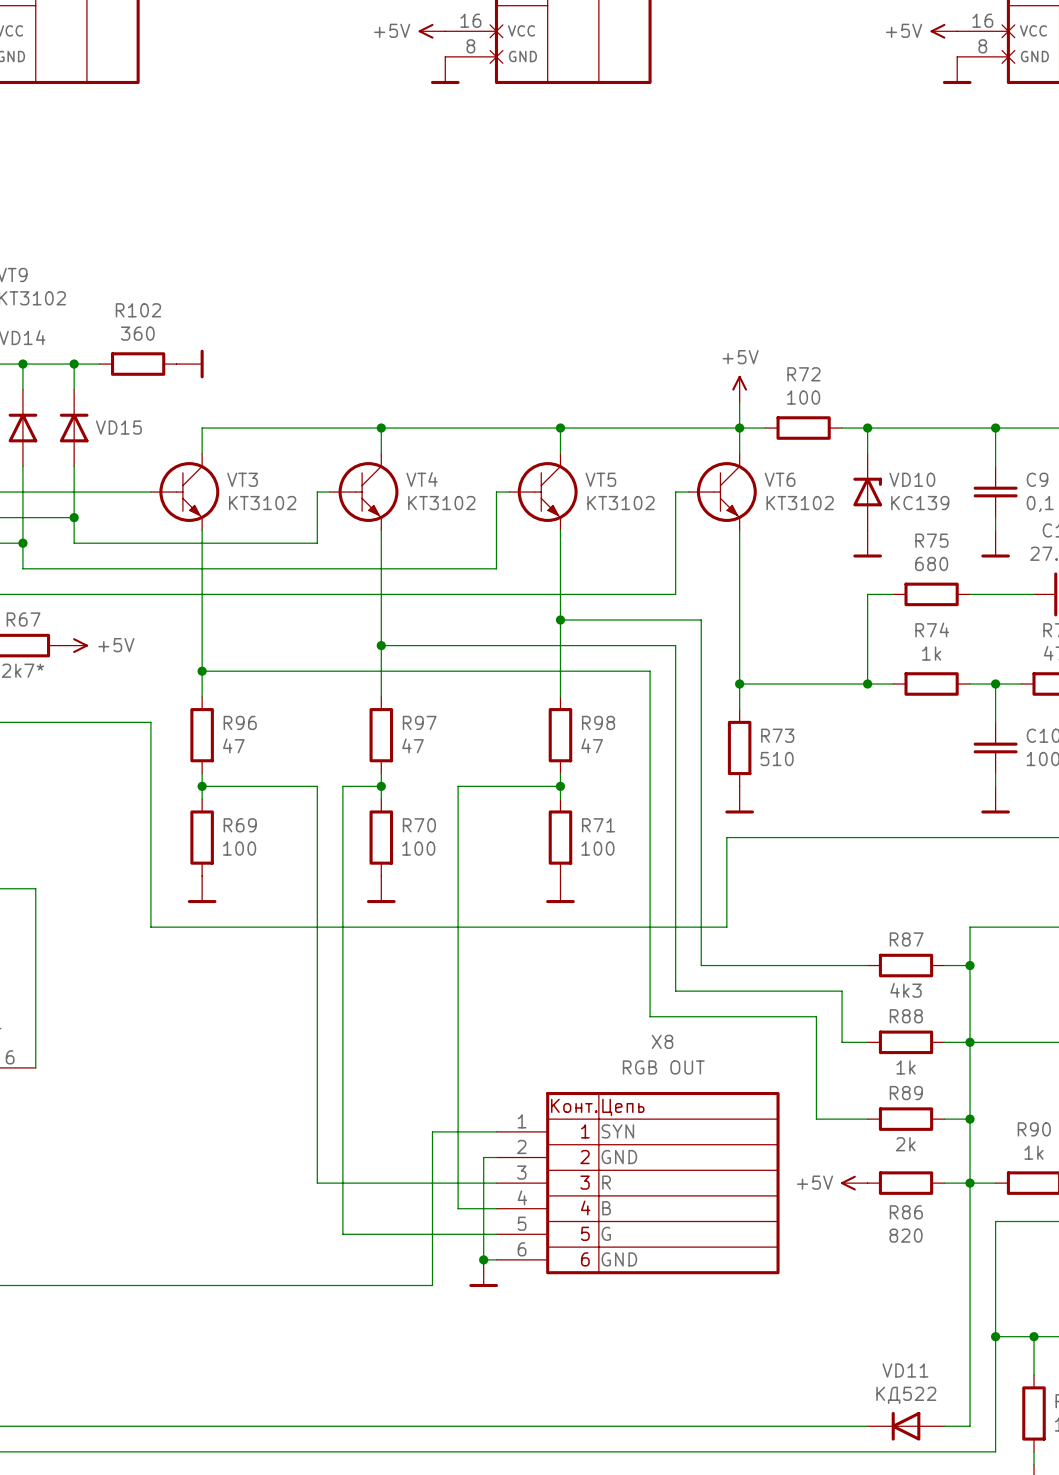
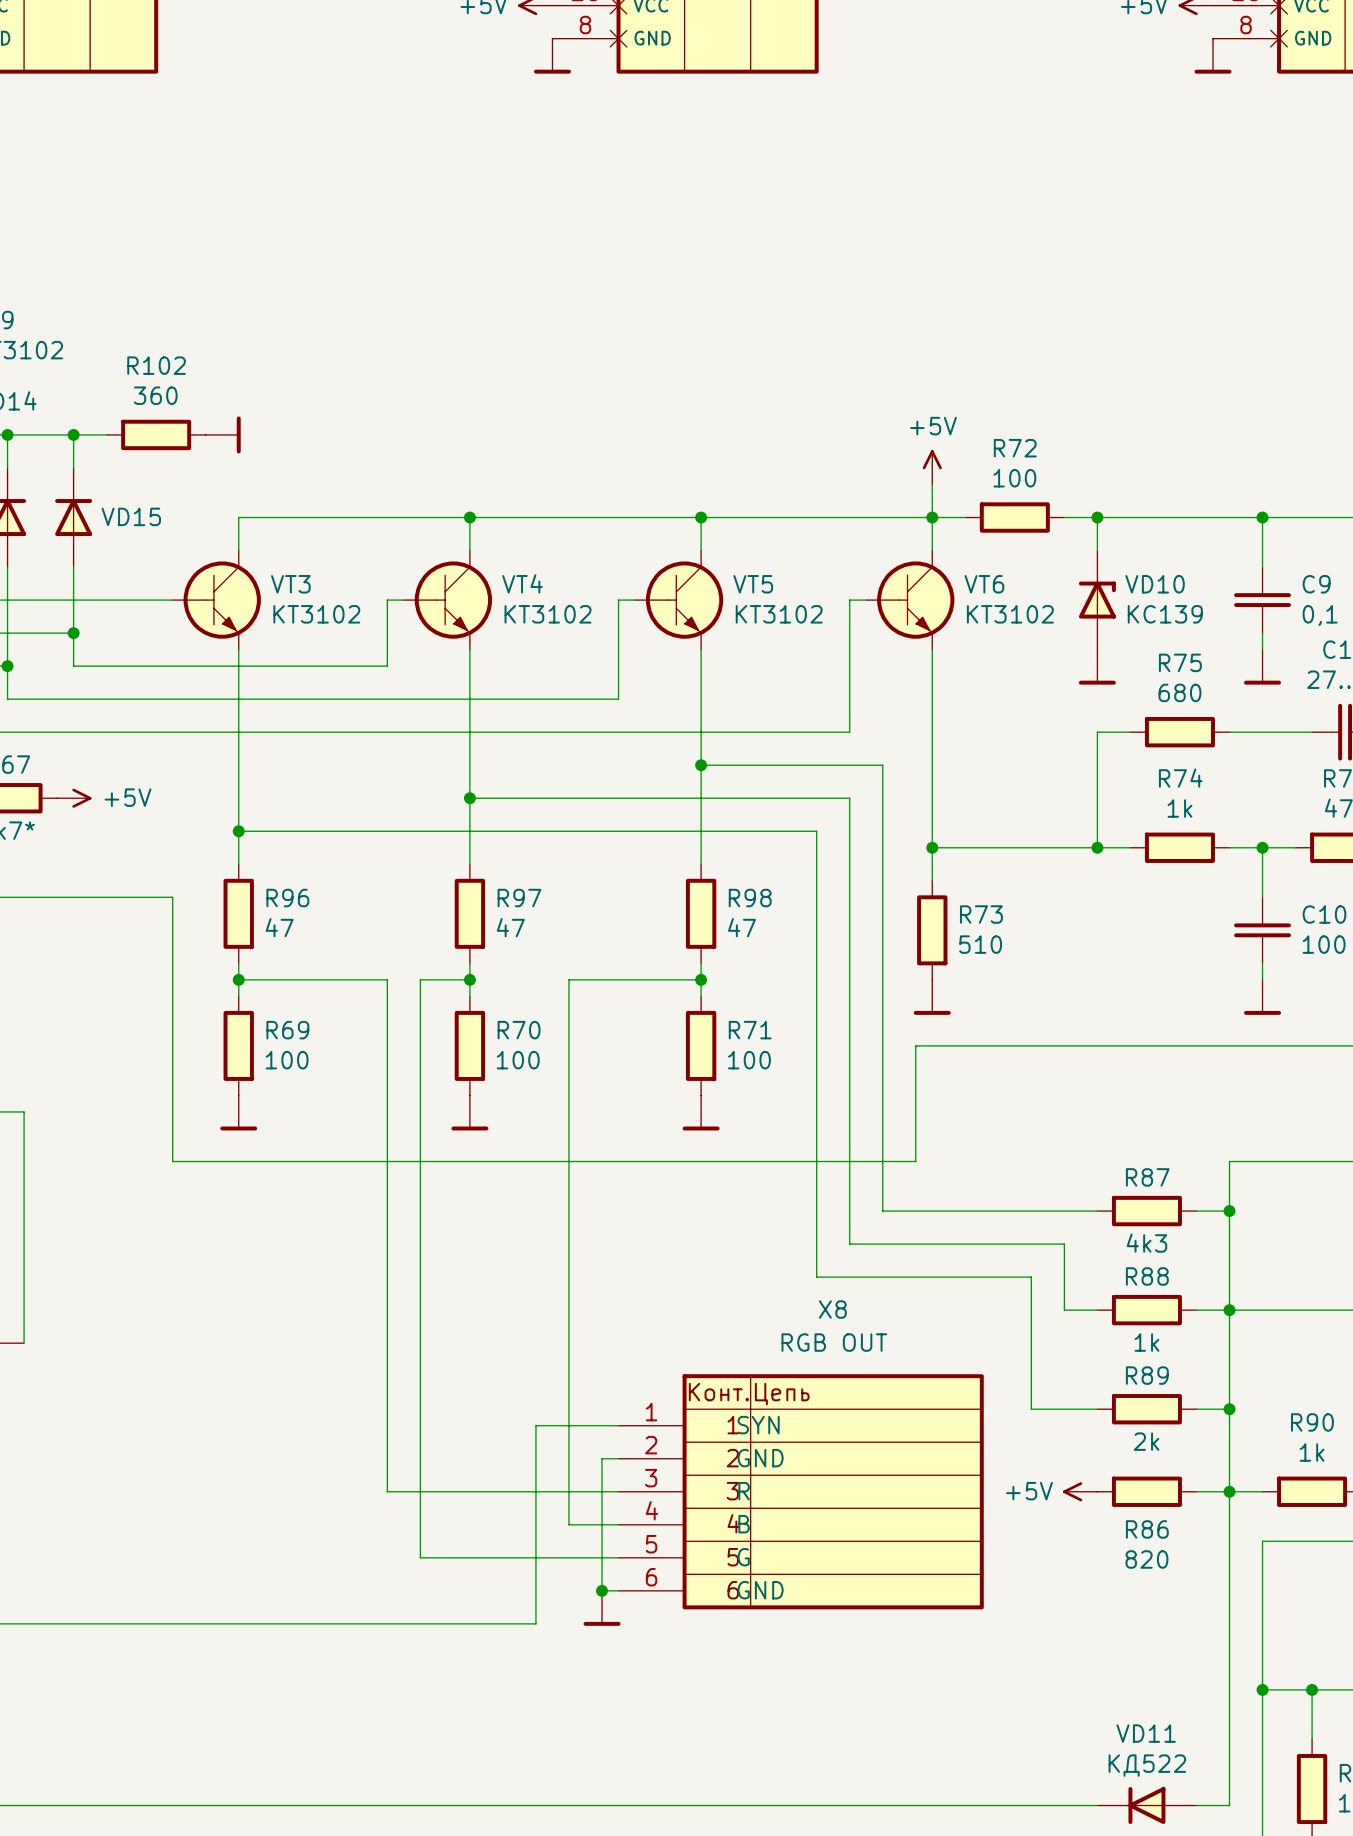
X8 text position: SYN (617, 1131) -> SYN (758, 1425)
X8 text position: GND (619, 1157) -> GND (760, 1458)
X8 text position: R (606, 1182) -> R (744, 1491)
X8 text position: B (606, 1208) -> B (744, 1524)
X8 text position: G (606, 1233) -> G (743, 1557)
X8 text position: GND (619, 1259) -> GND (760, 1590)

